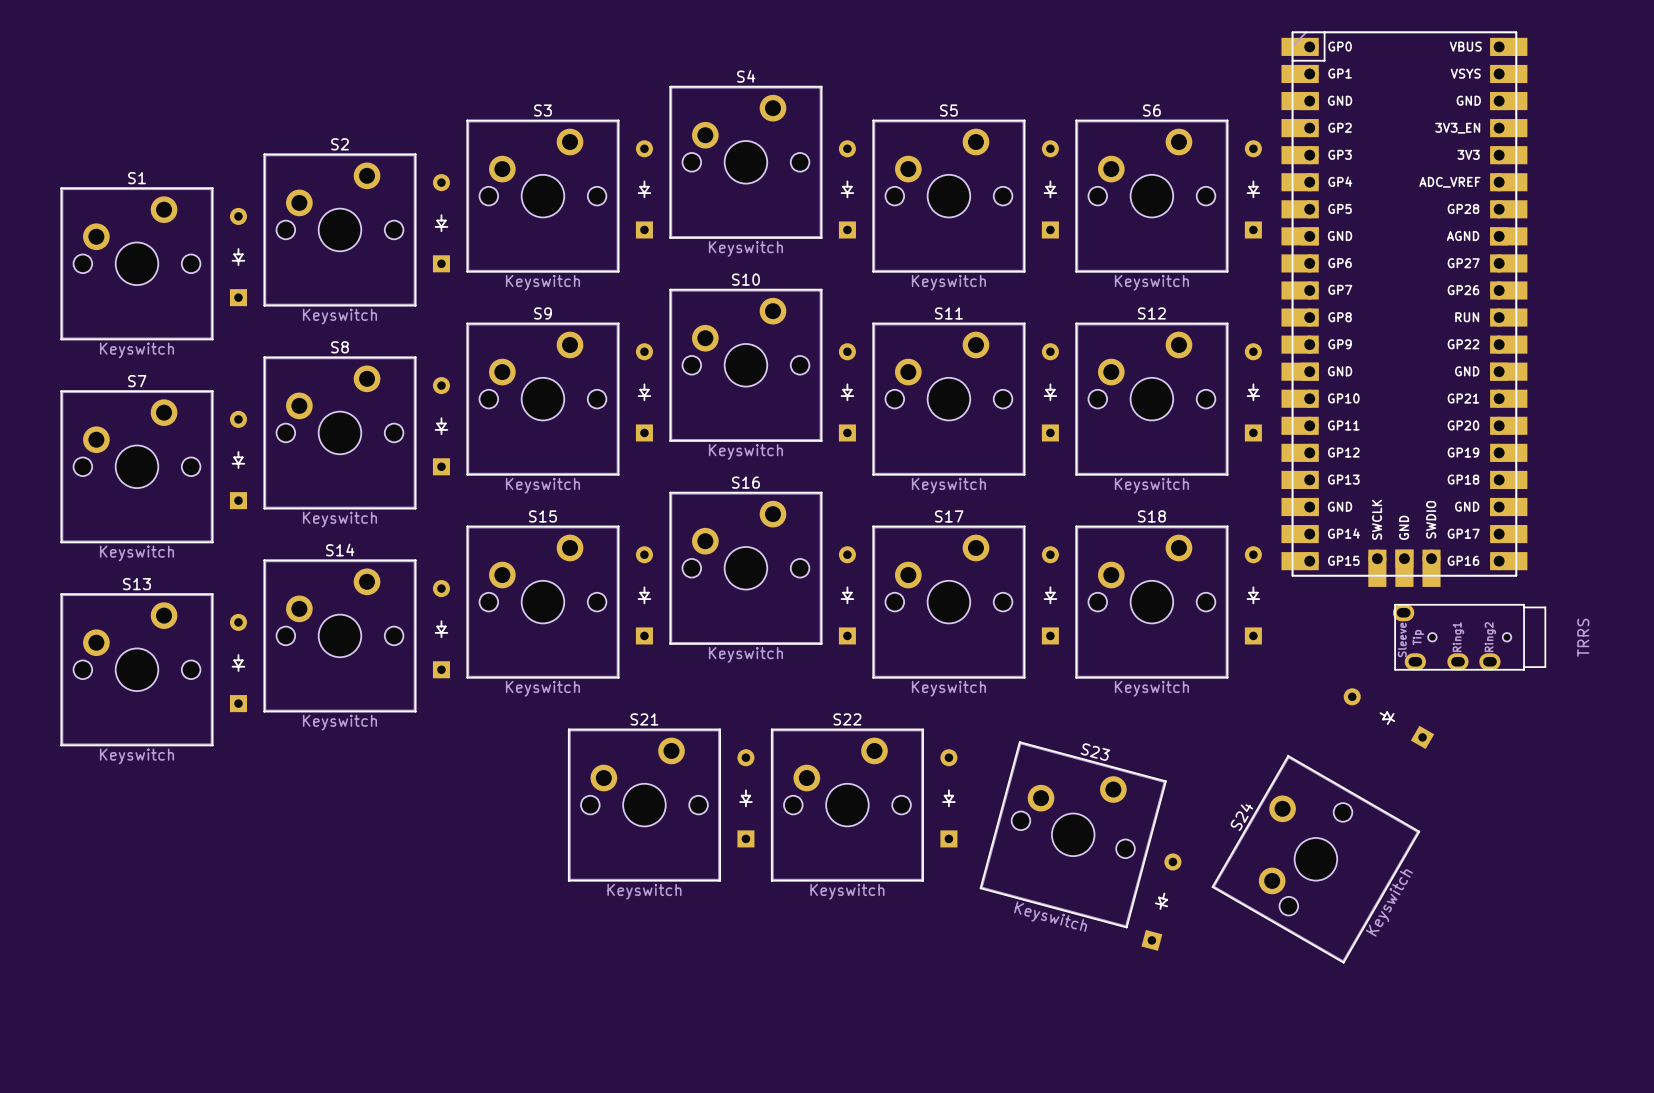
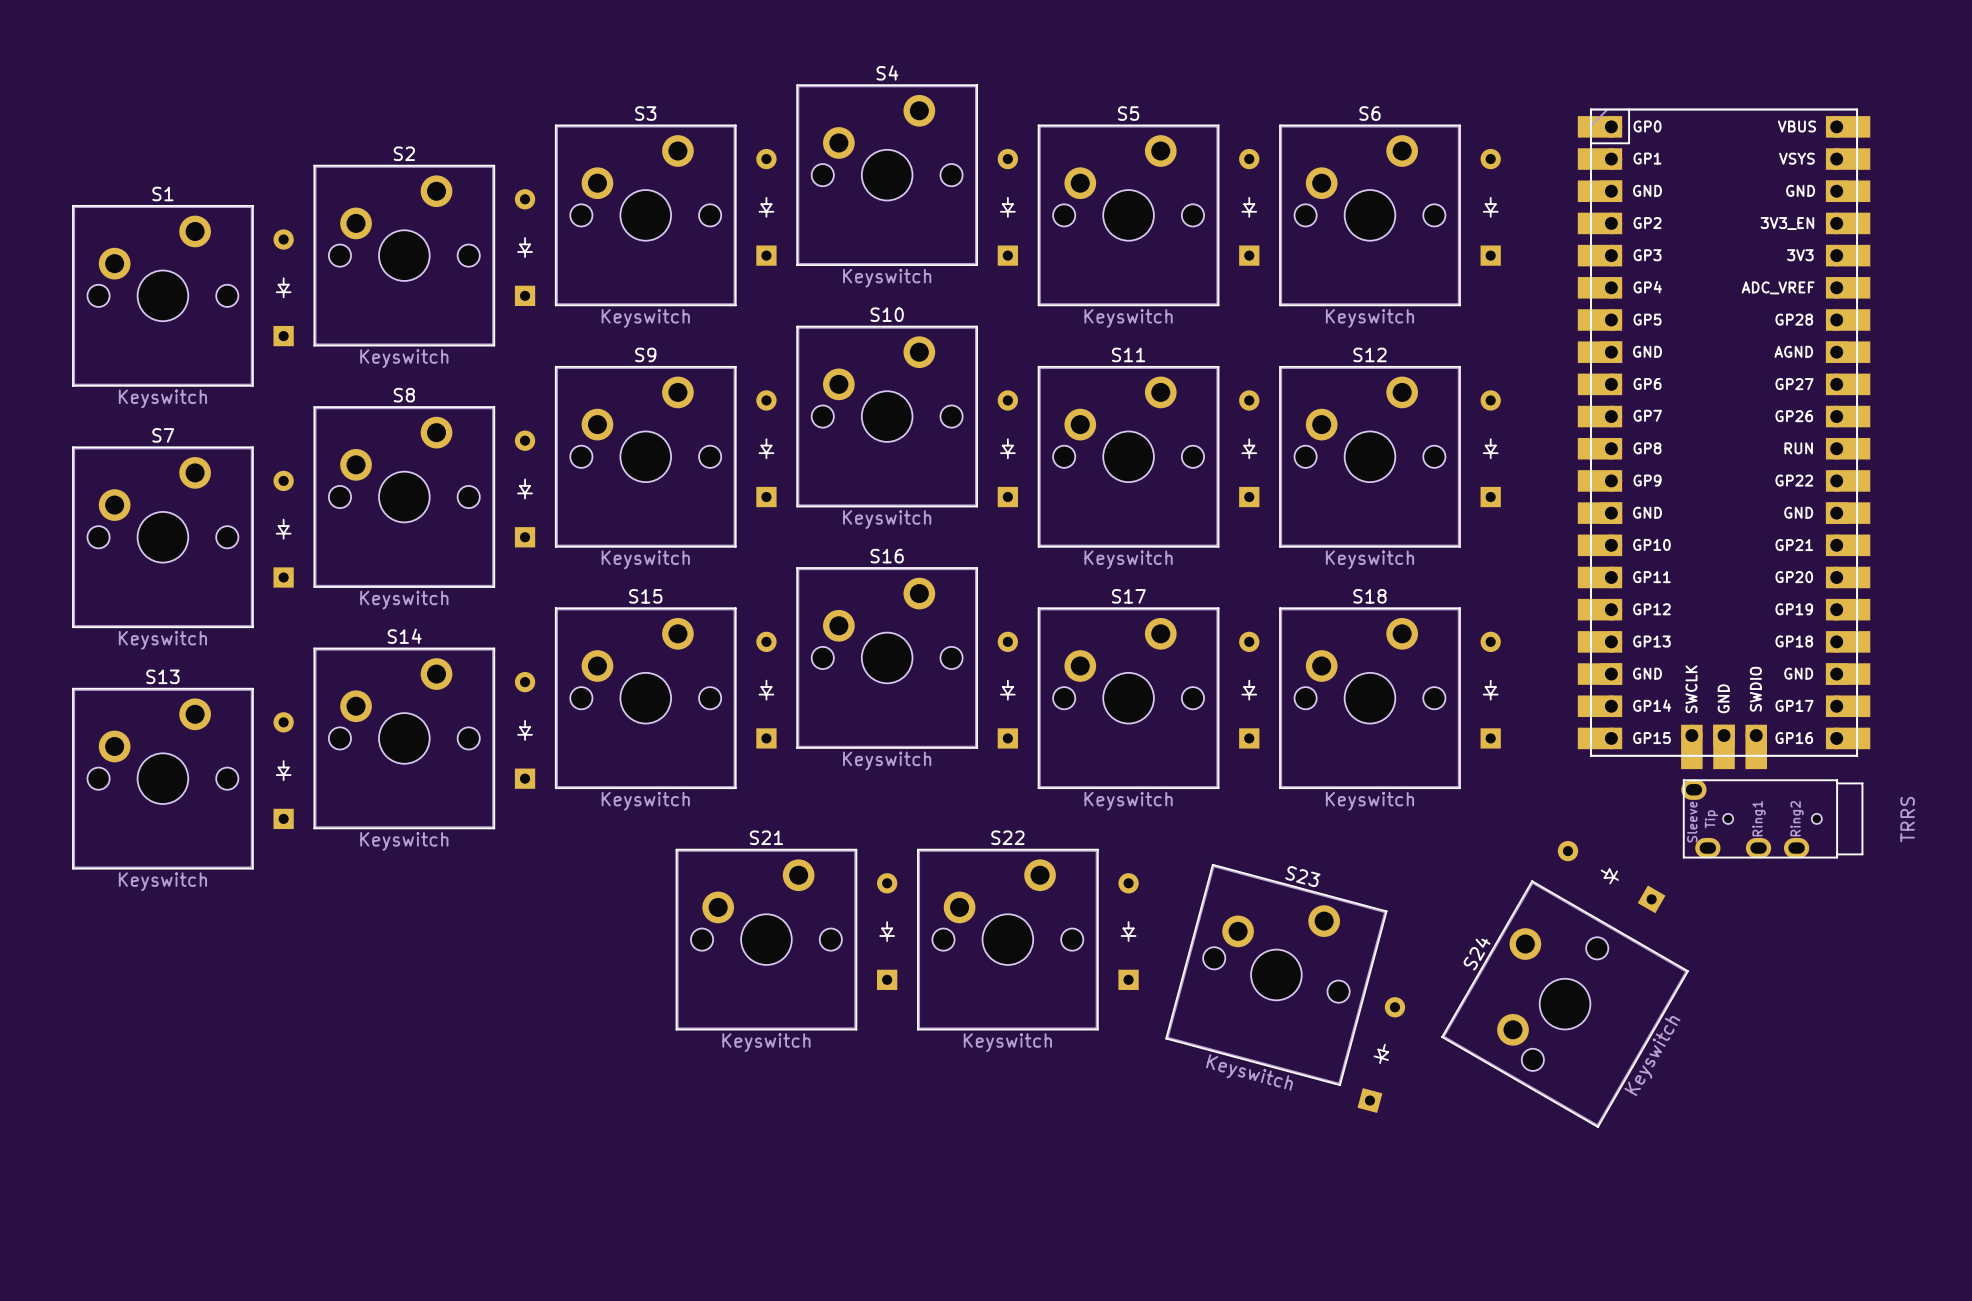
part position: (1404, 309) -> (1724, 438)
part position: (1469, 637) -> (1772, 818)
part position: (1388, 718) -> (1611, 877)

